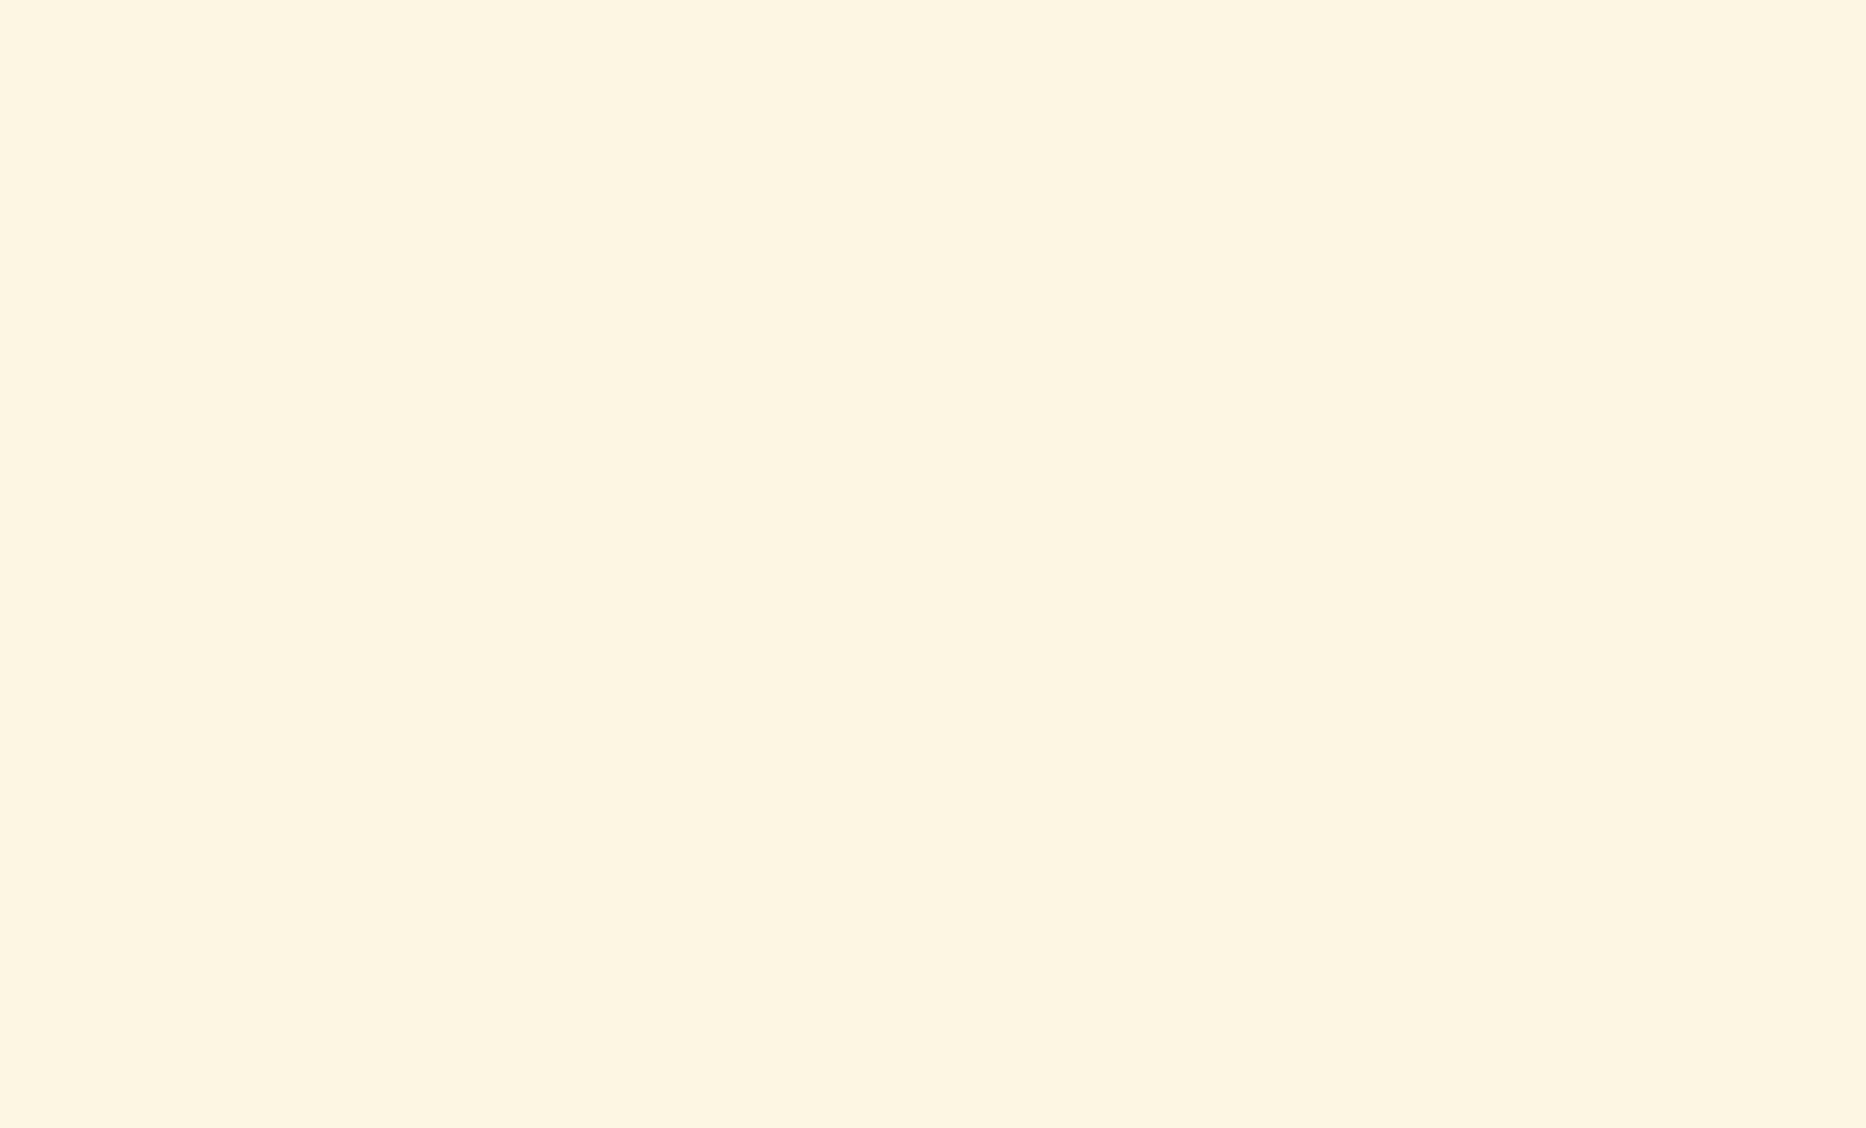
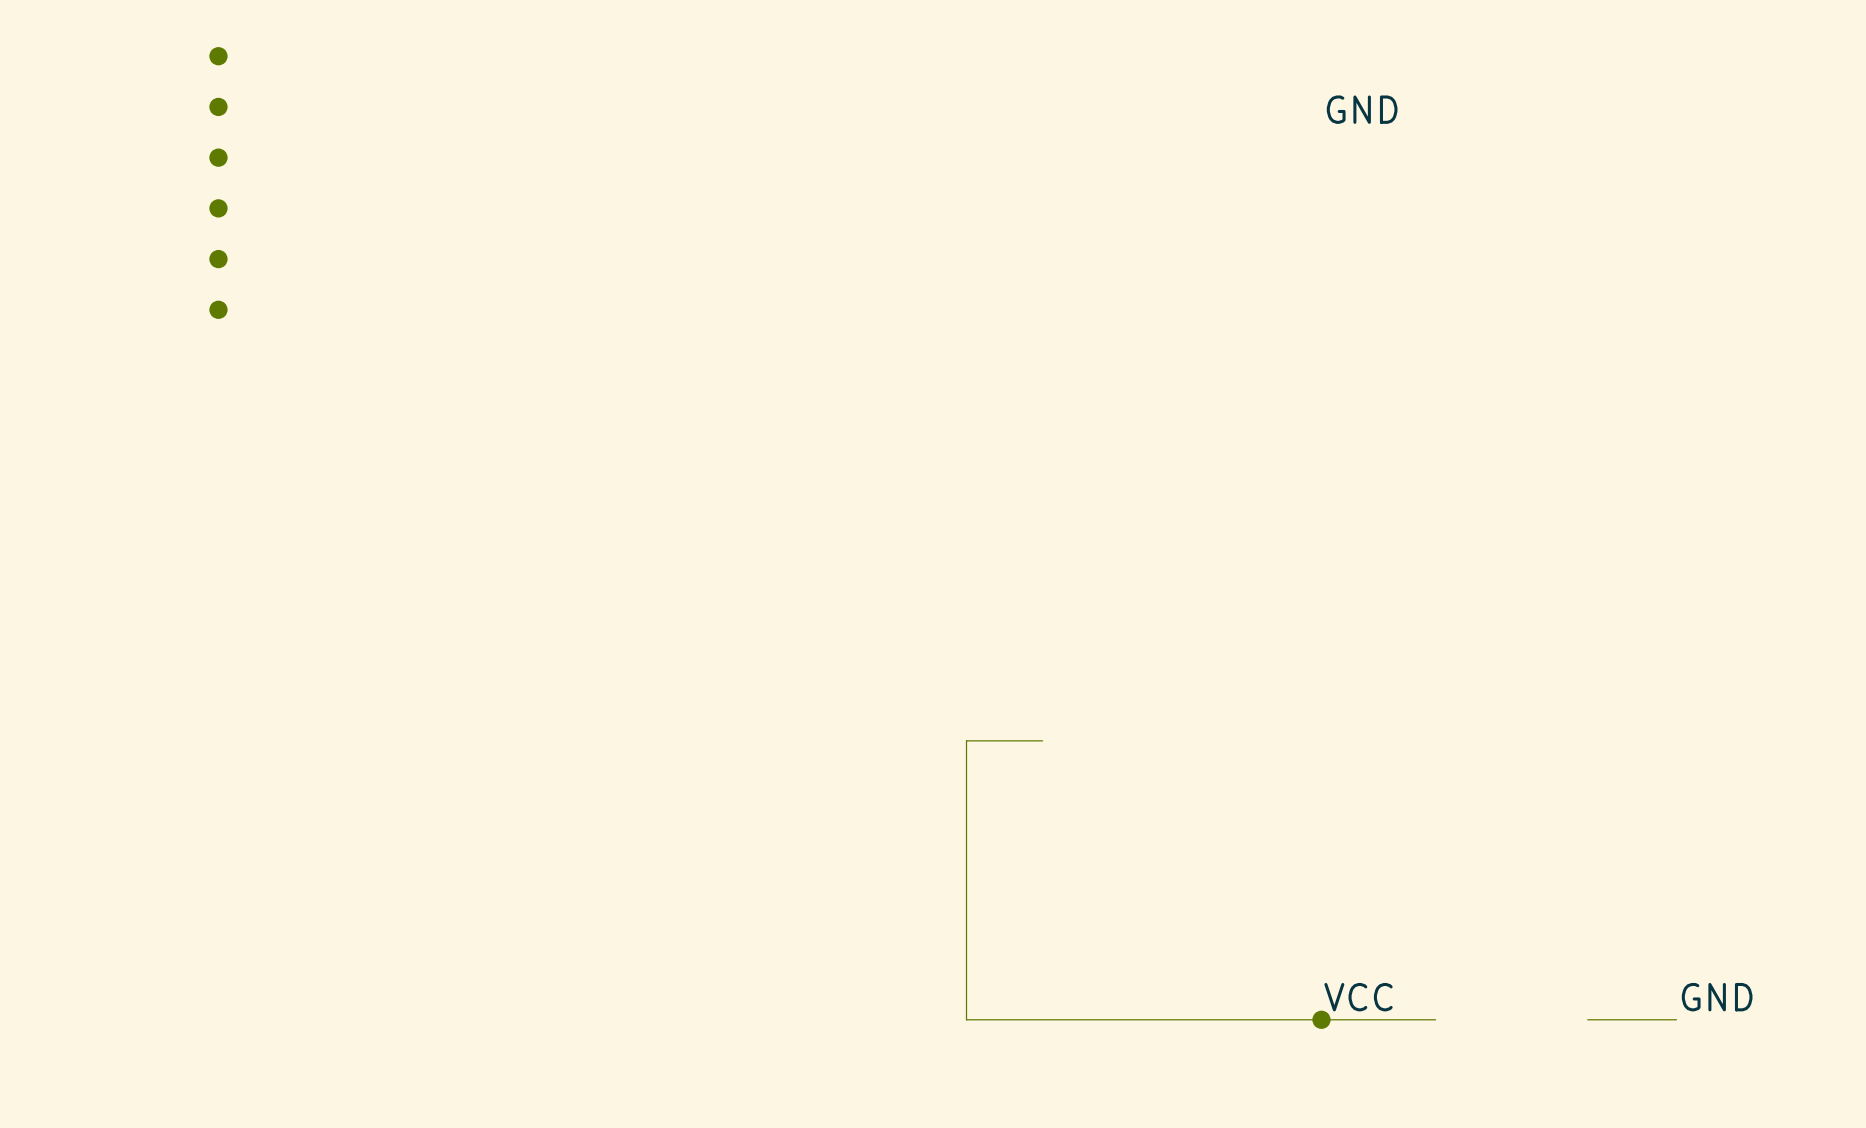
junction: none -> (218, 56)
junction: none -> (218, 106)
label: none -> GND (1362, 109)
junction: none -> (218, 157)
junction: none -> (218, 208)
junction: none -> (218, 259)
junction: none -> (218, 309)
wire: none -> (1042, 740) (966, 740) (966, 1019) (1435, 1019)
label: none -> VCC (1358, 997)
label: none -> GND (1717, 997)
junction: none -> (1321, 1019)
wire: none -> (1587, 1019) (1676, 1019)

